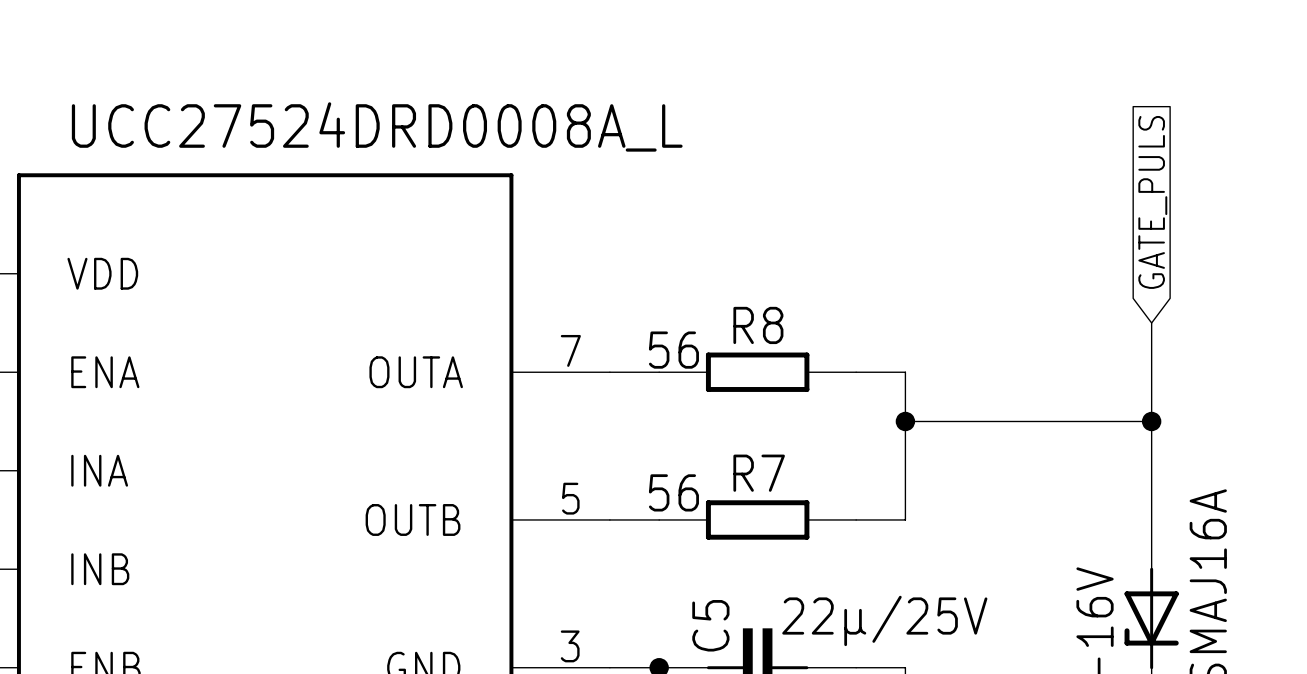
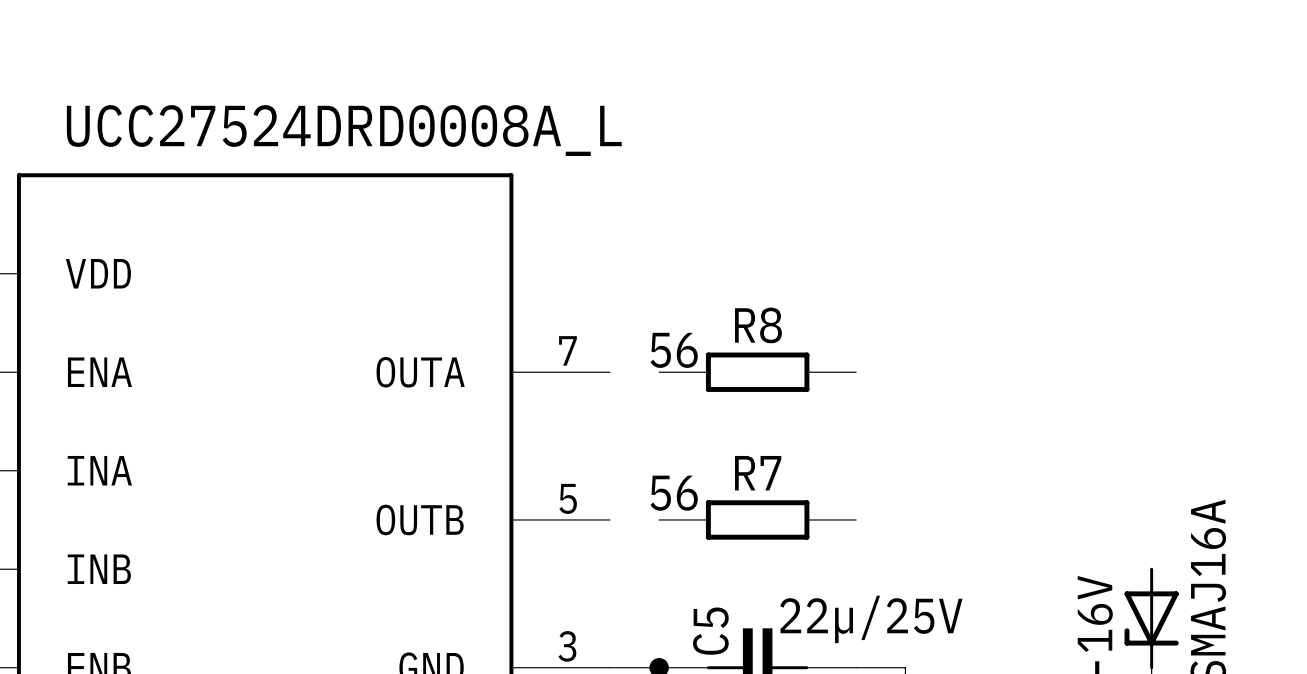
global label: GATE_PULS (1152, 202) -> none
wire: (1151, 322) (1151, 569) -> none
wire: (609, 372) (659, 372) -> none
wire: (856, 372) (905, 372) (905, 519) (856, 519) -> none
wire: (905, 421) (1151, 421) -> none
junction: (905, 421) -> none
junction: (1151, 421) -> none
wire: (609, 519) (659, 519) -> none

